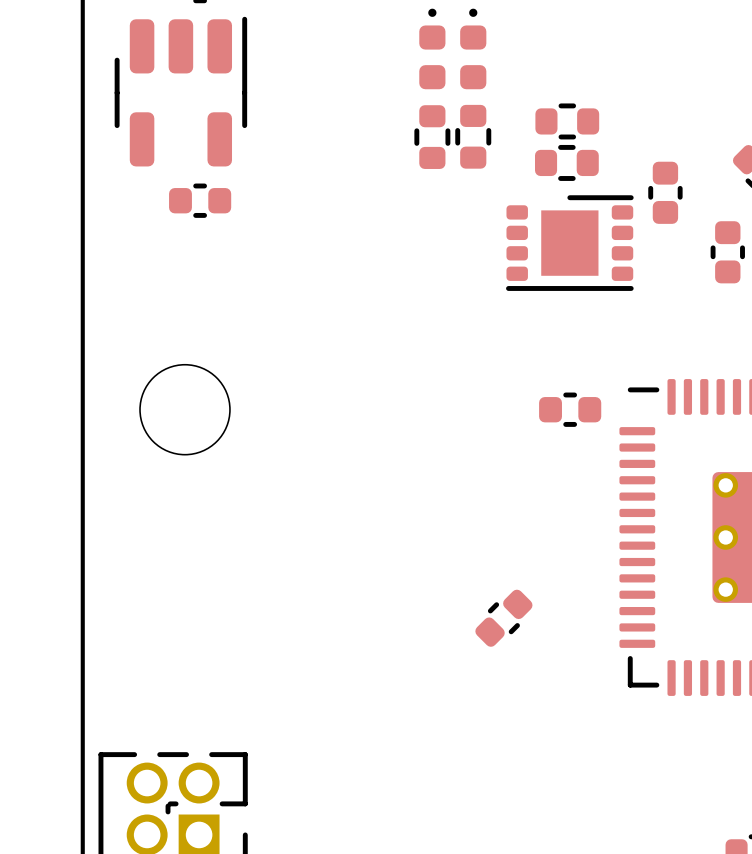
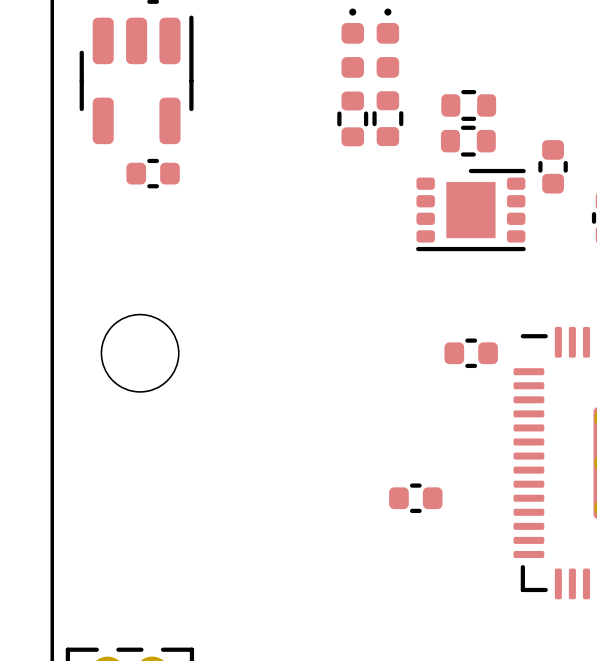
part rotation: 0° (503, 618) -> 45° clockwise (415, 498)
part position: (503, 618) -> (415, 498)

